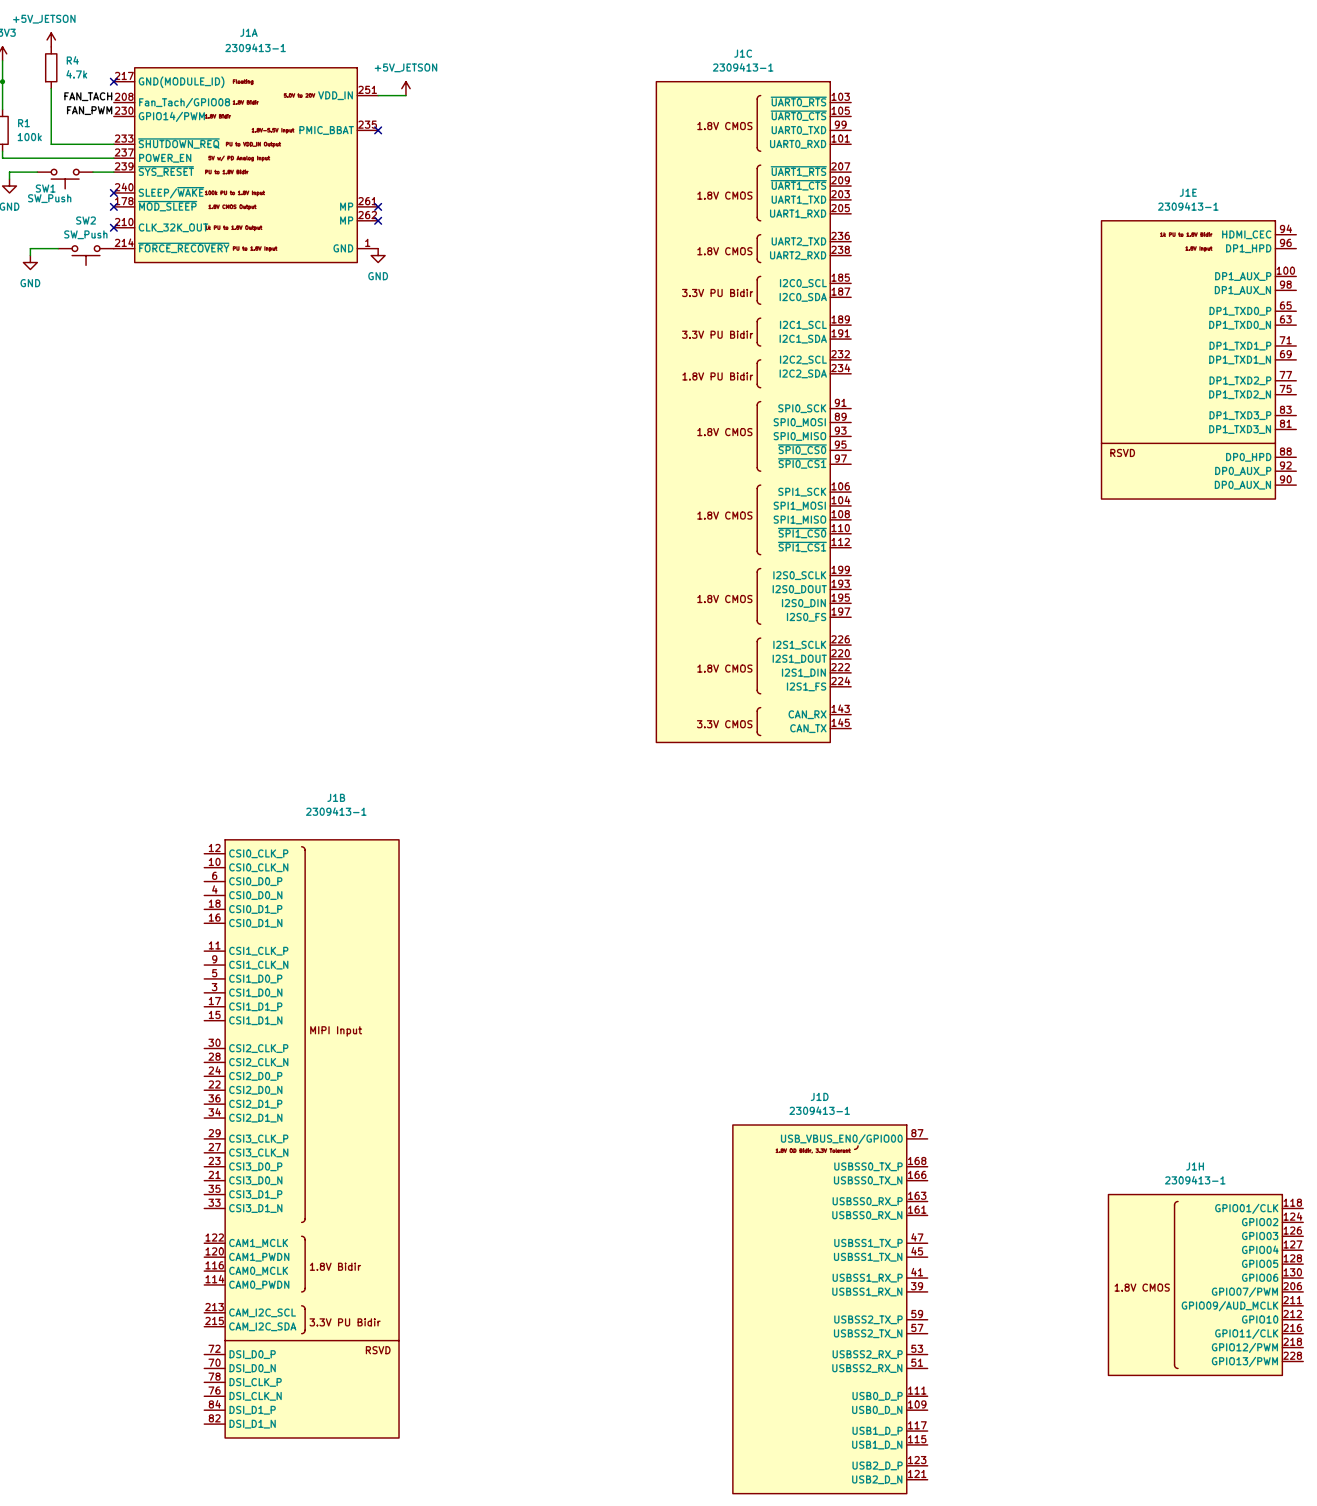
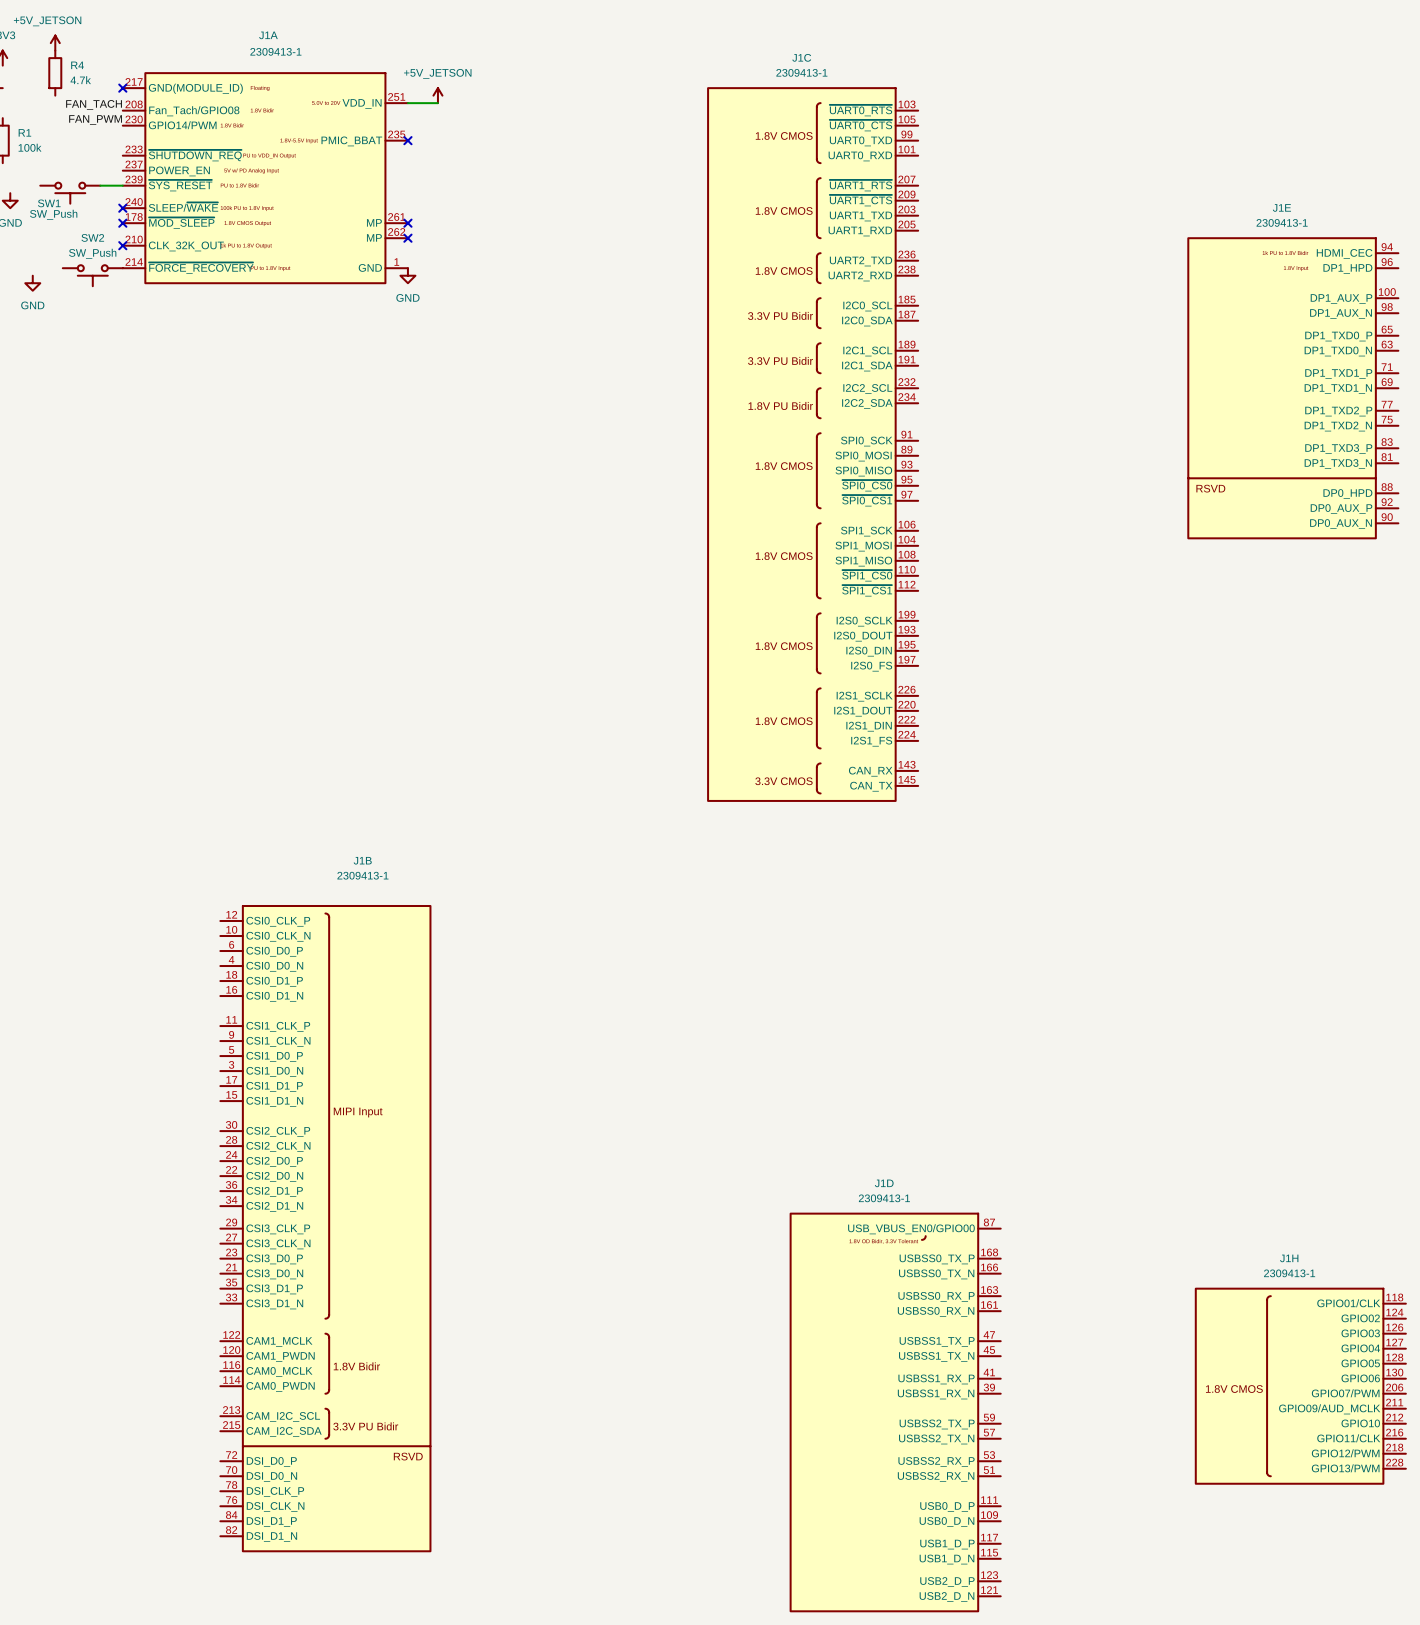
wire: (2, 60) (2, 109) -> none
junction: (2, 81) -> none
wire: (51, 88) (51, 144) (113, 144) -> none
wire: (2, 151) (2, 158) (113, 158) -> none
wire: (37, 172) (9, 172) (9, 179) -> none
wire: (58, 248) (30, 248) (30, 255) -> none

